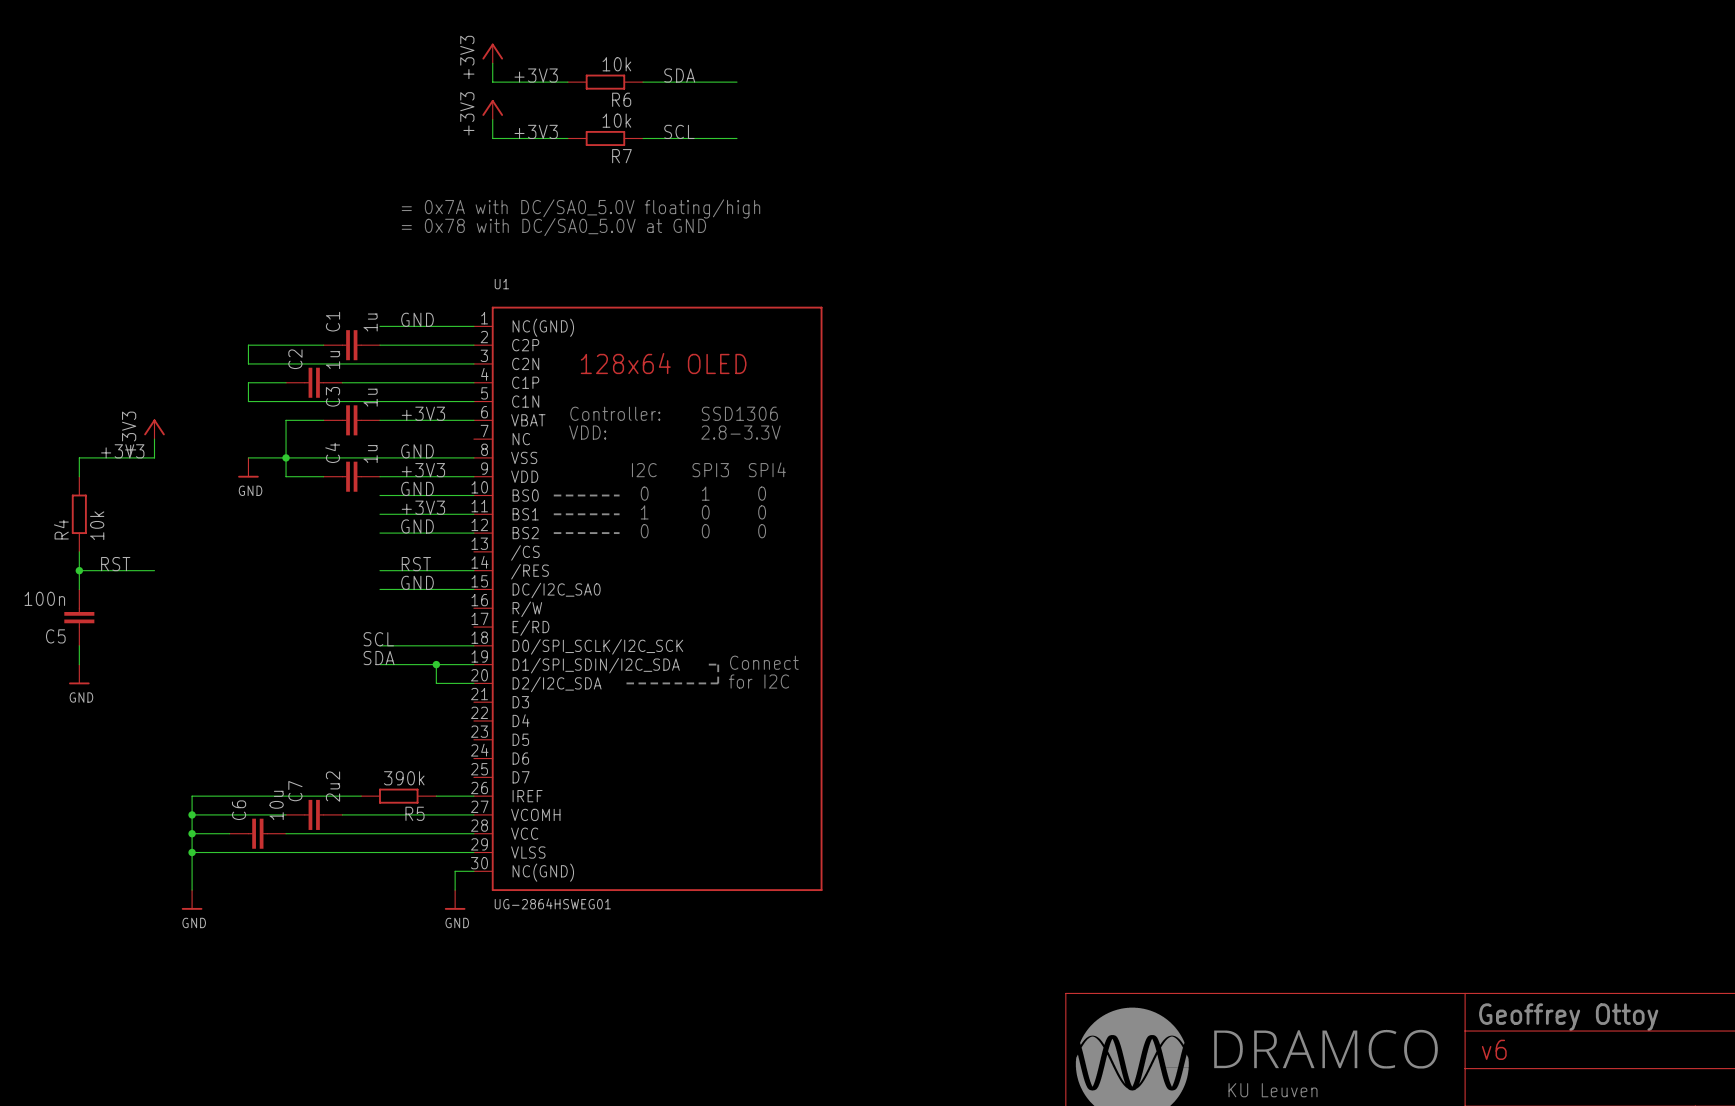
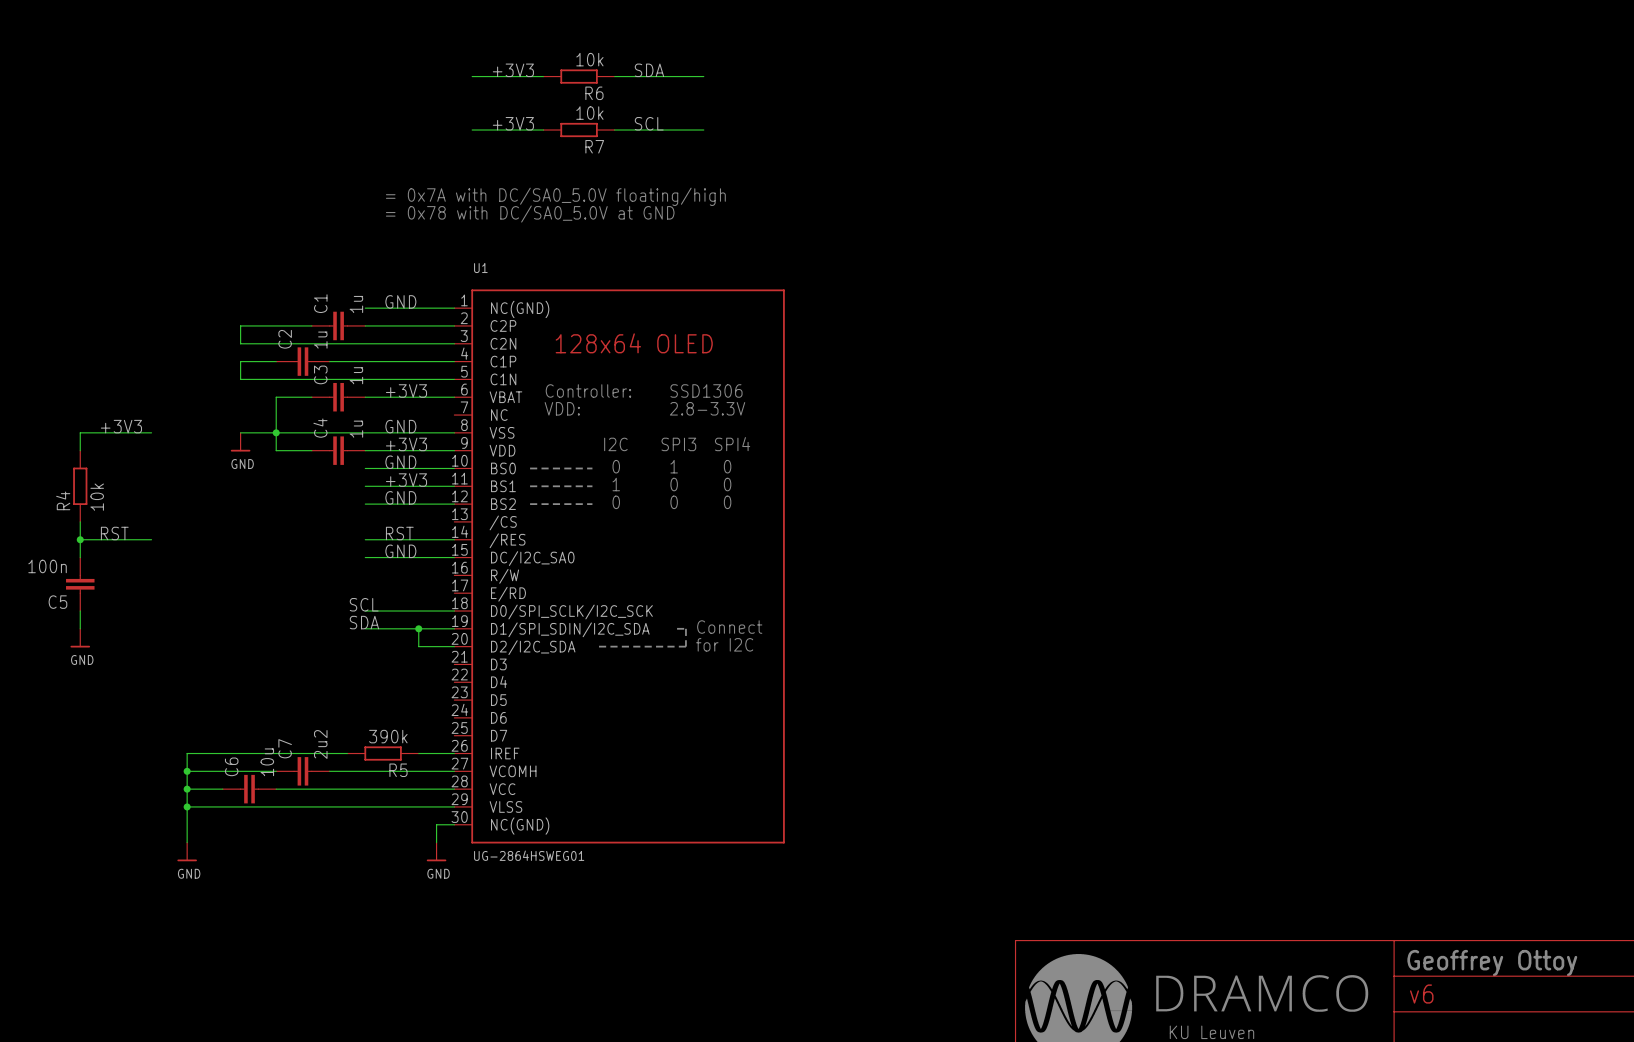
power symbol: +3V3 (492, 53) -> none
wire: (492, 63) (492, 82) -> none
power symbol: +3V3 (492, 109) -> none
wire: (492, 119) (492, 138) -> none
power symbol: +3V3 (154, 429) -> none
wire: (154, 439) (154, 457) -> none

